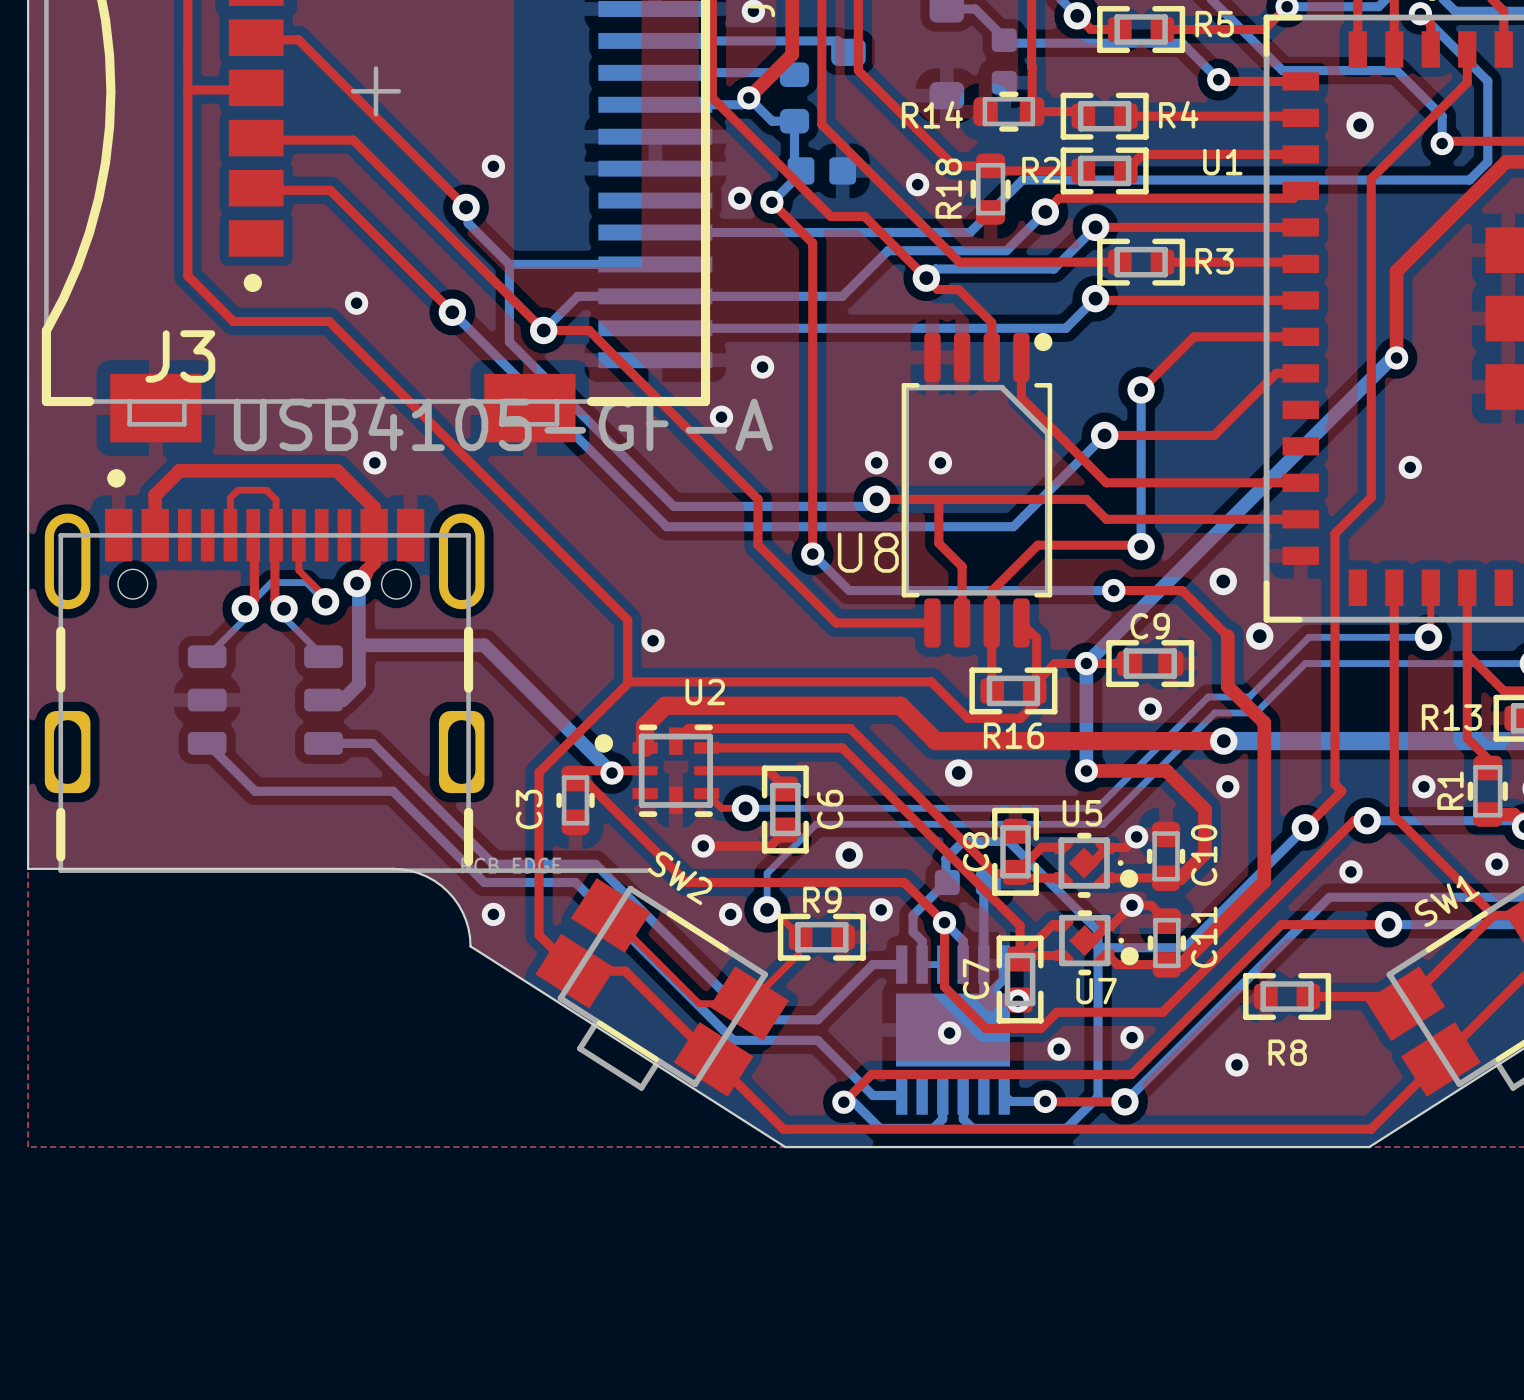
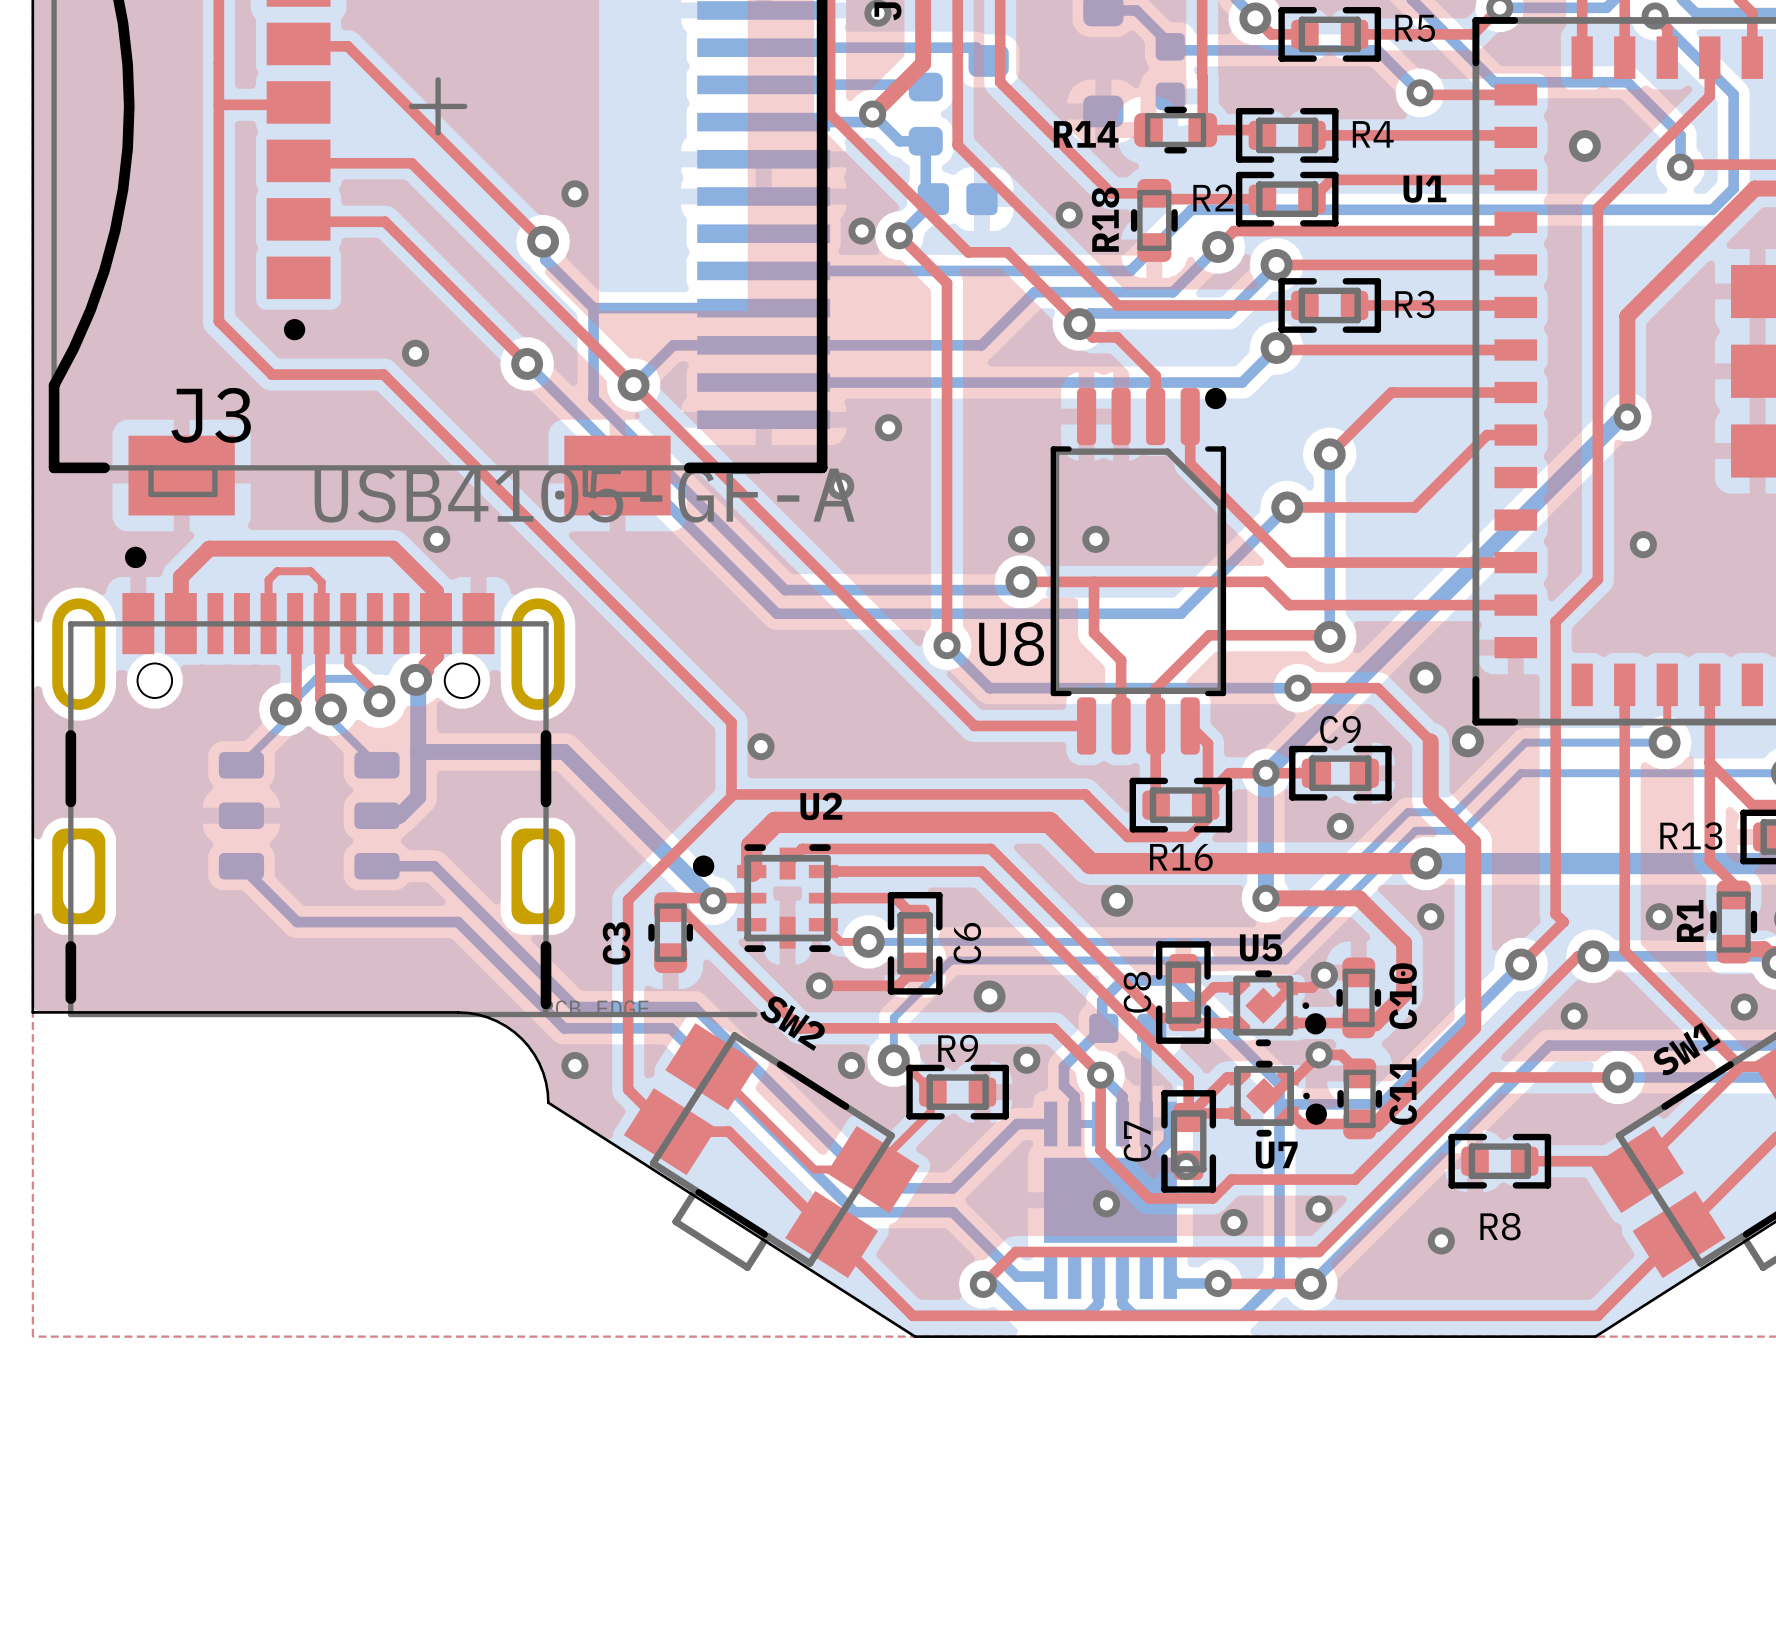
top track: (543, 330) (589, 330) (757, 499) (757, 544) (836, 623) -> (633, 385) (974, 725)

